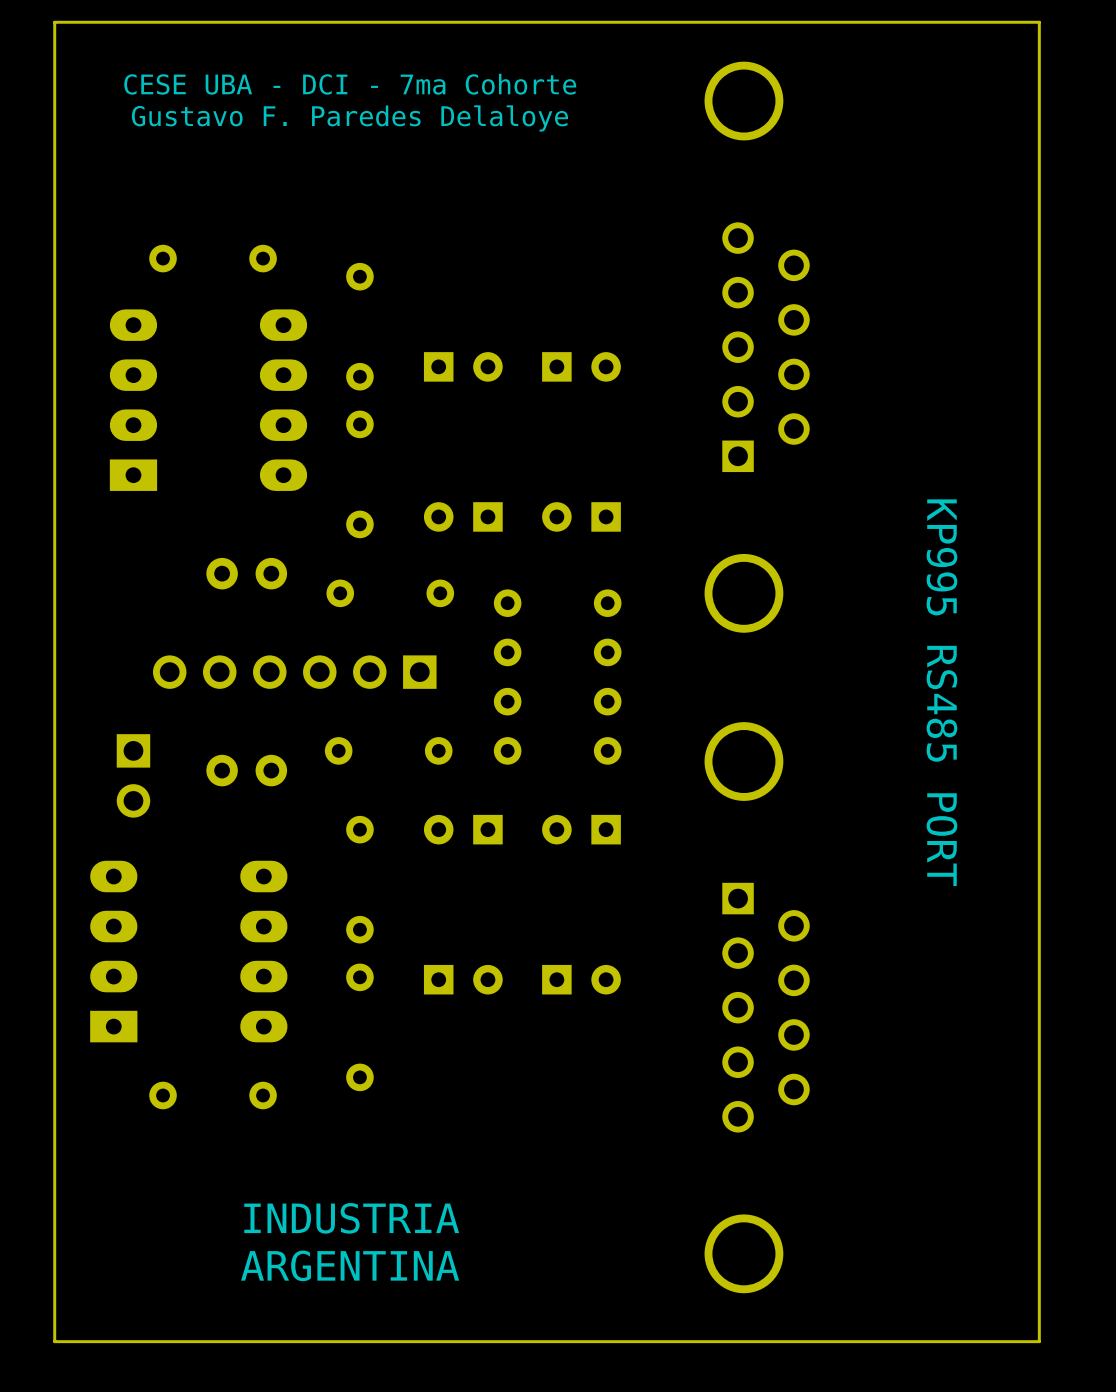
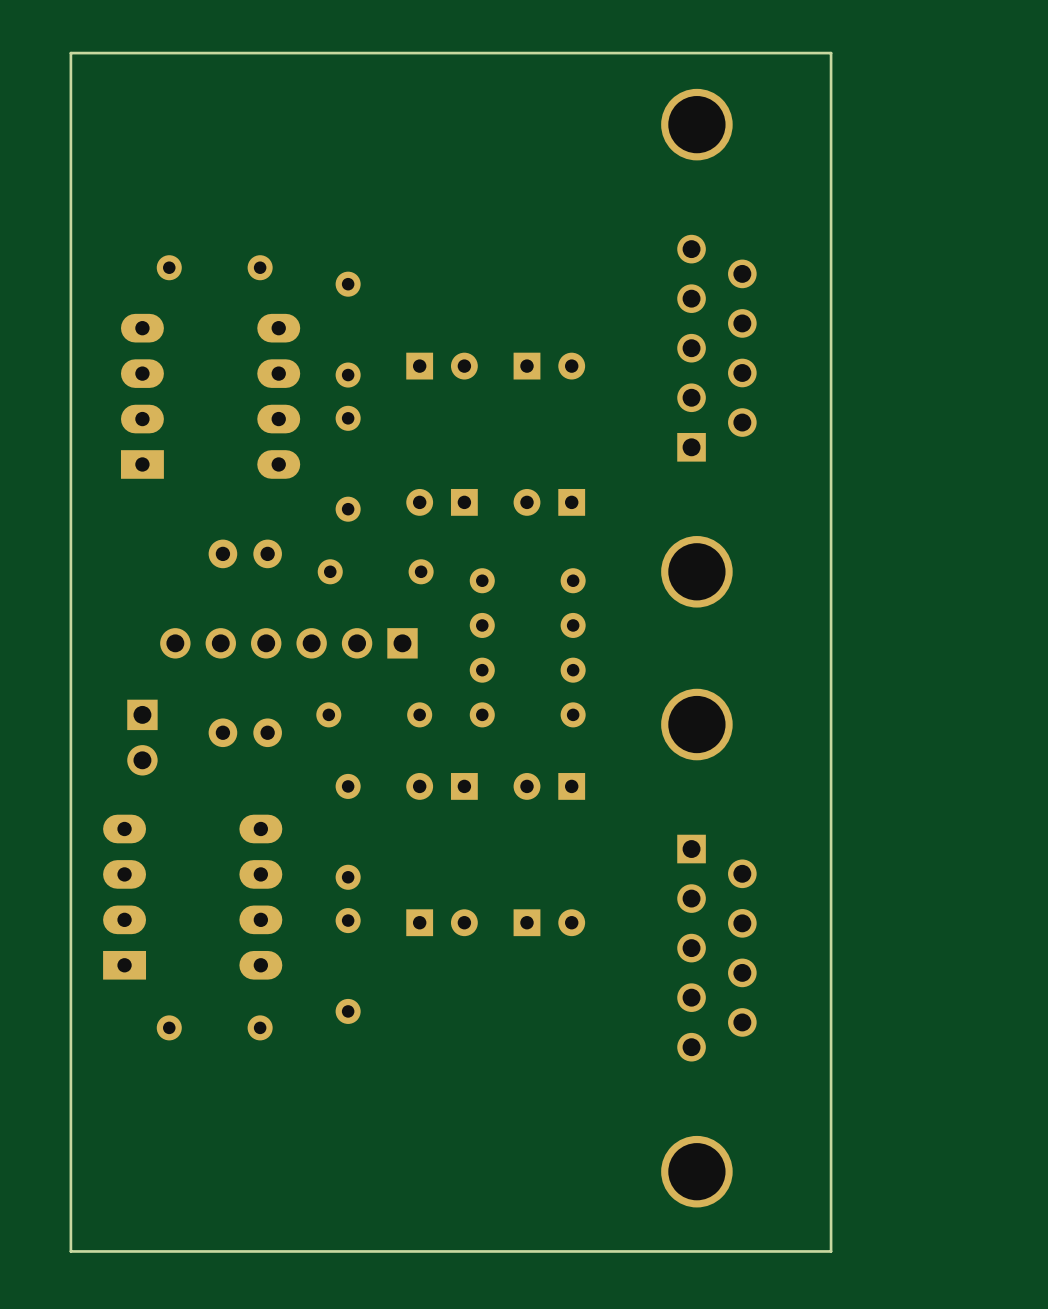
board edge: (891, 22) (1039, 22) (1039, 1341) (891, 1341) -> (831, 53) (831, 1251)
text: CESE UBA - DCI - 7ma Cohorte (350, 84) -> none
text: Gustavo F. Paredes Delaloye (349, 118) -> none
text: KP995 RS485 PORT (941, 692) -> none
text: INDUSTRIA (351, 1218) -> none
text: ARGENTINA (350, 1265) -> none

